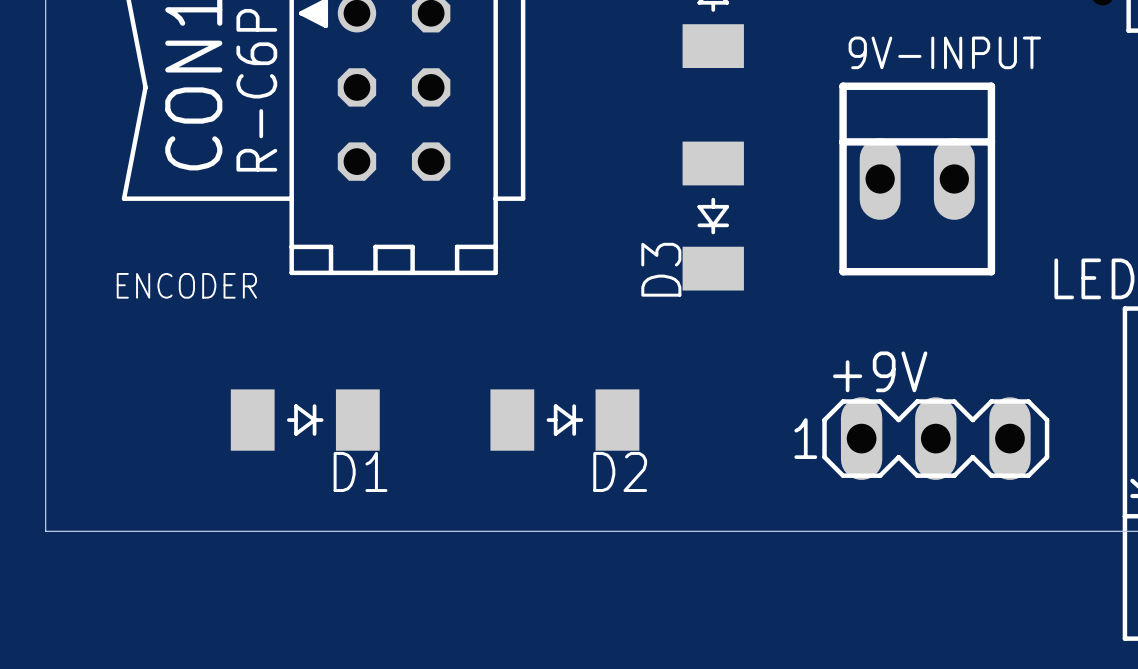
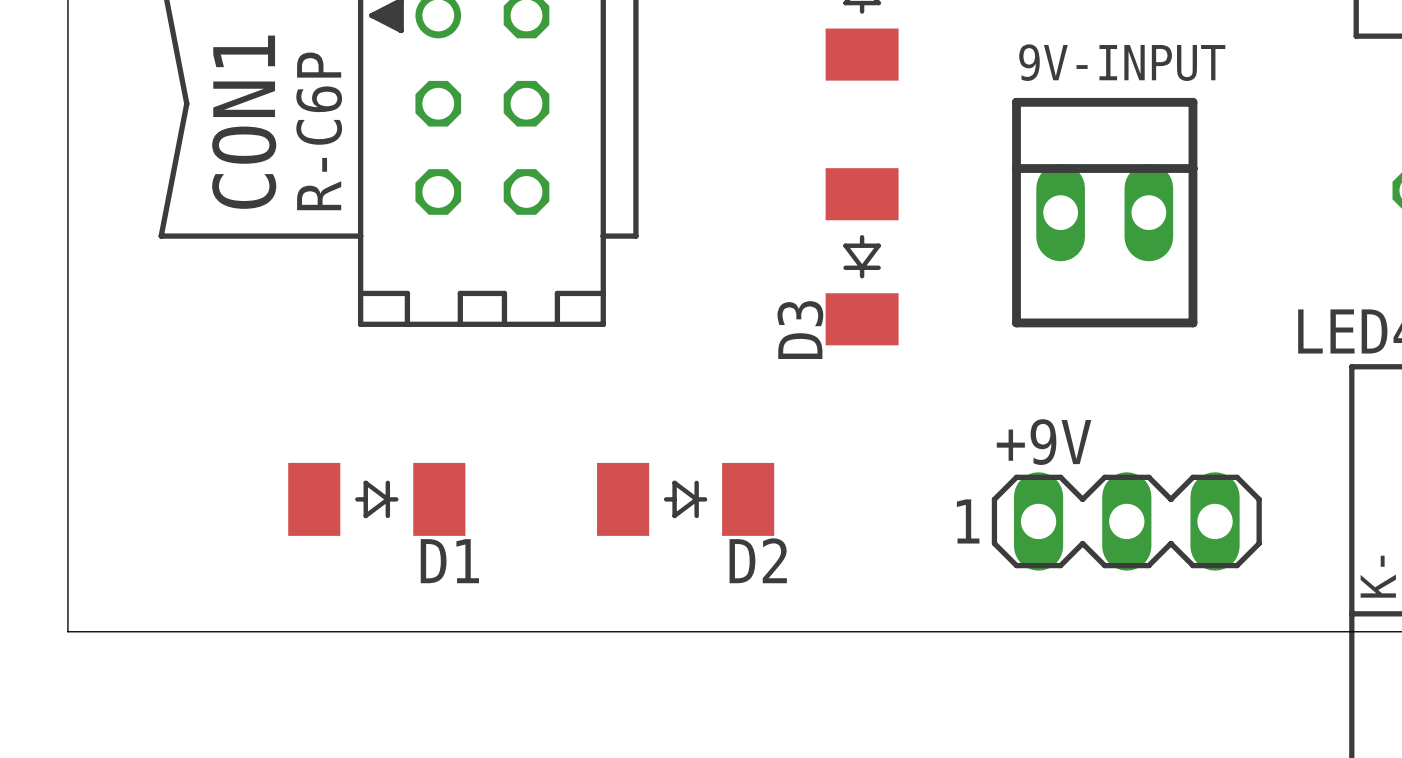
text: ENCODER (186, 285) -> none

